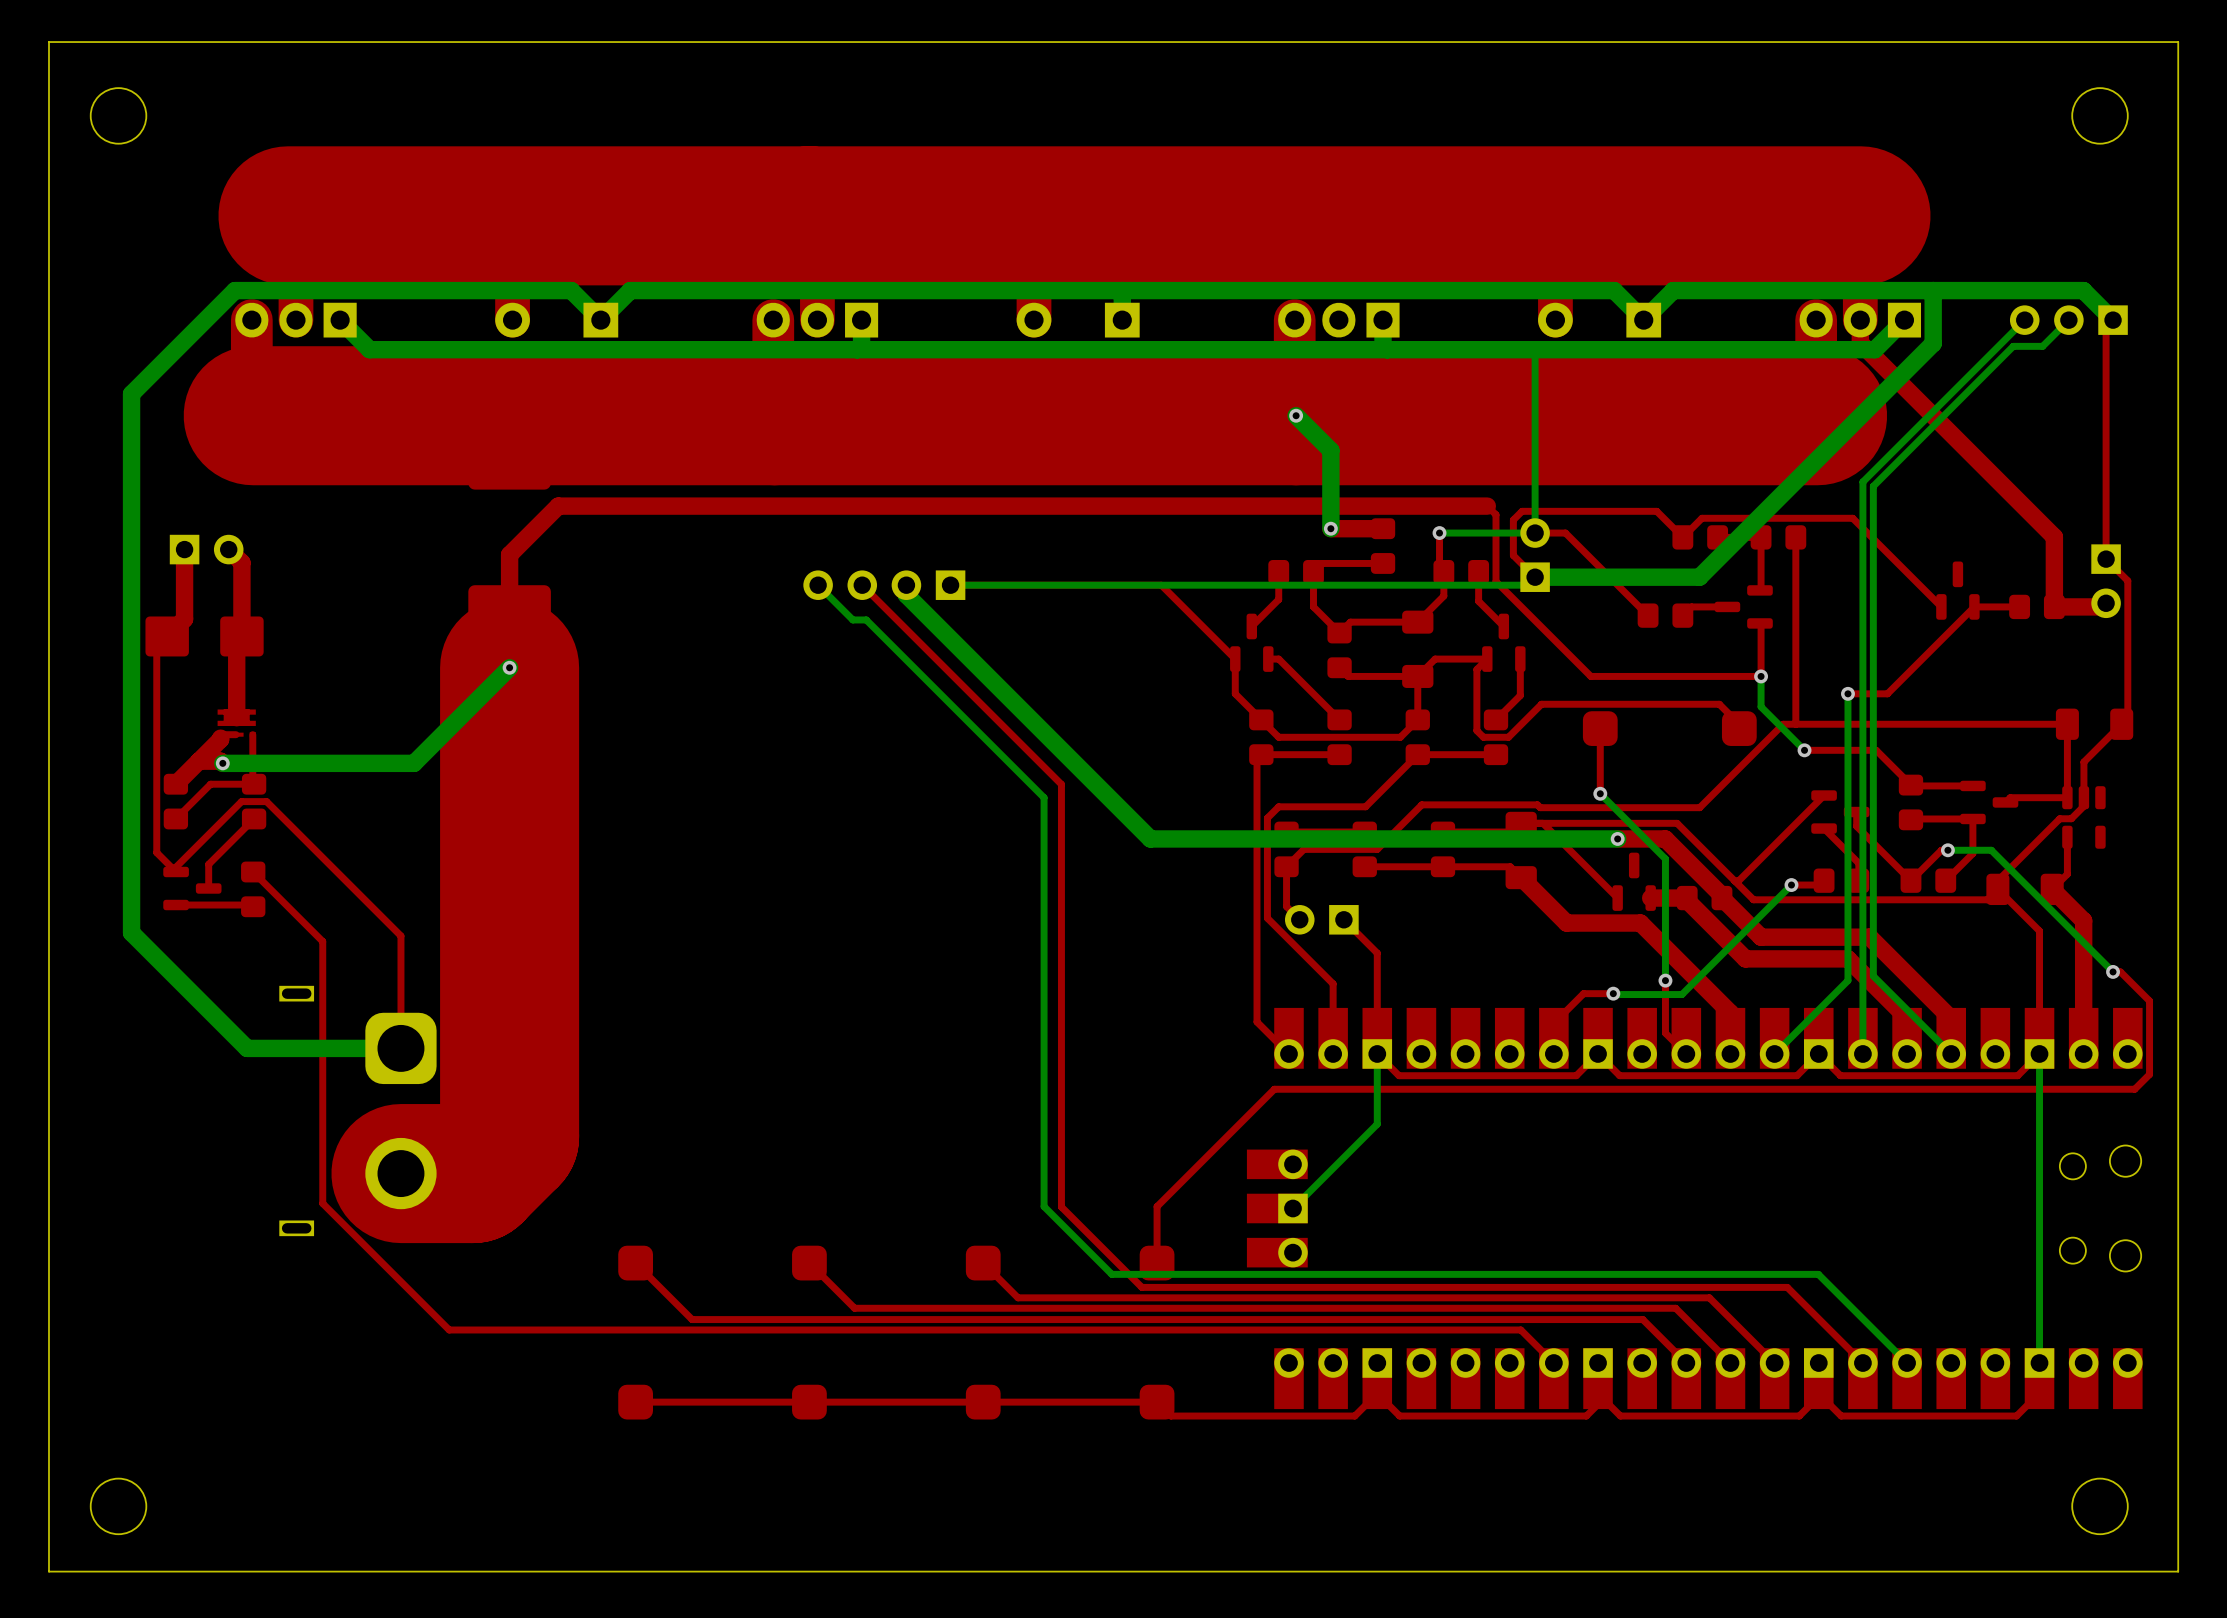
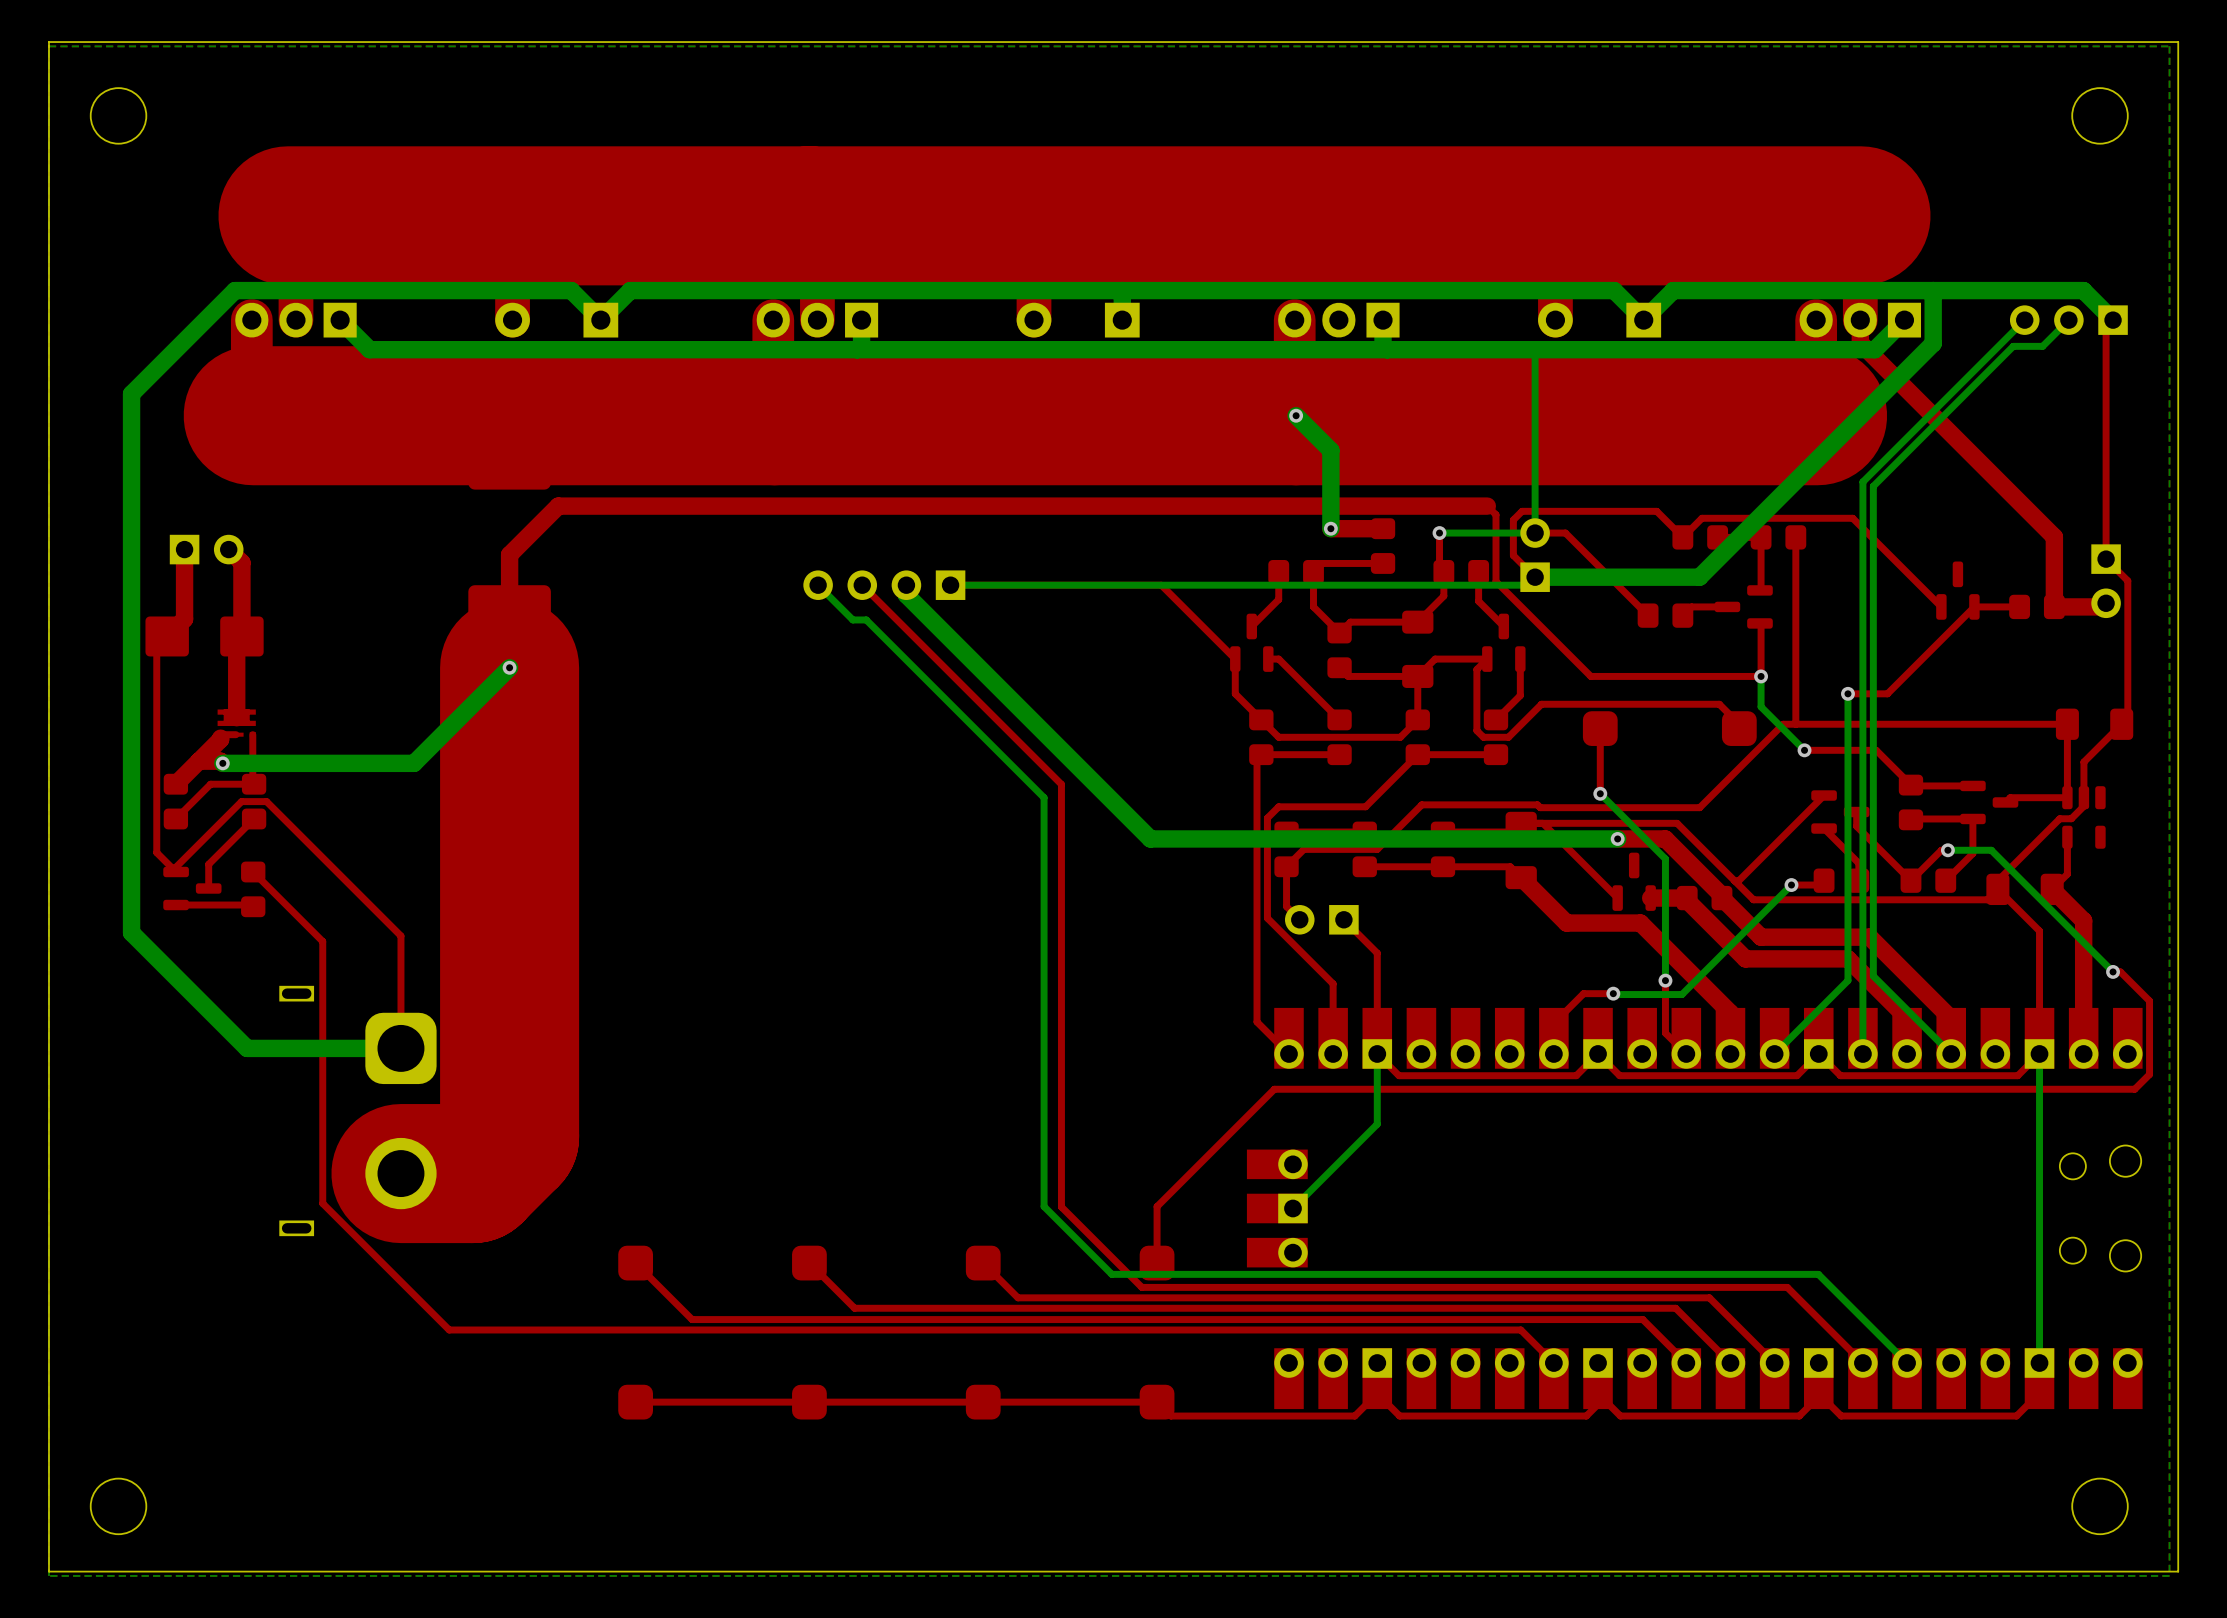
bottom zone outline: none -> (2169, 46) (48, 46) (48, 1575) (2169, 1575) (2169, 46)

